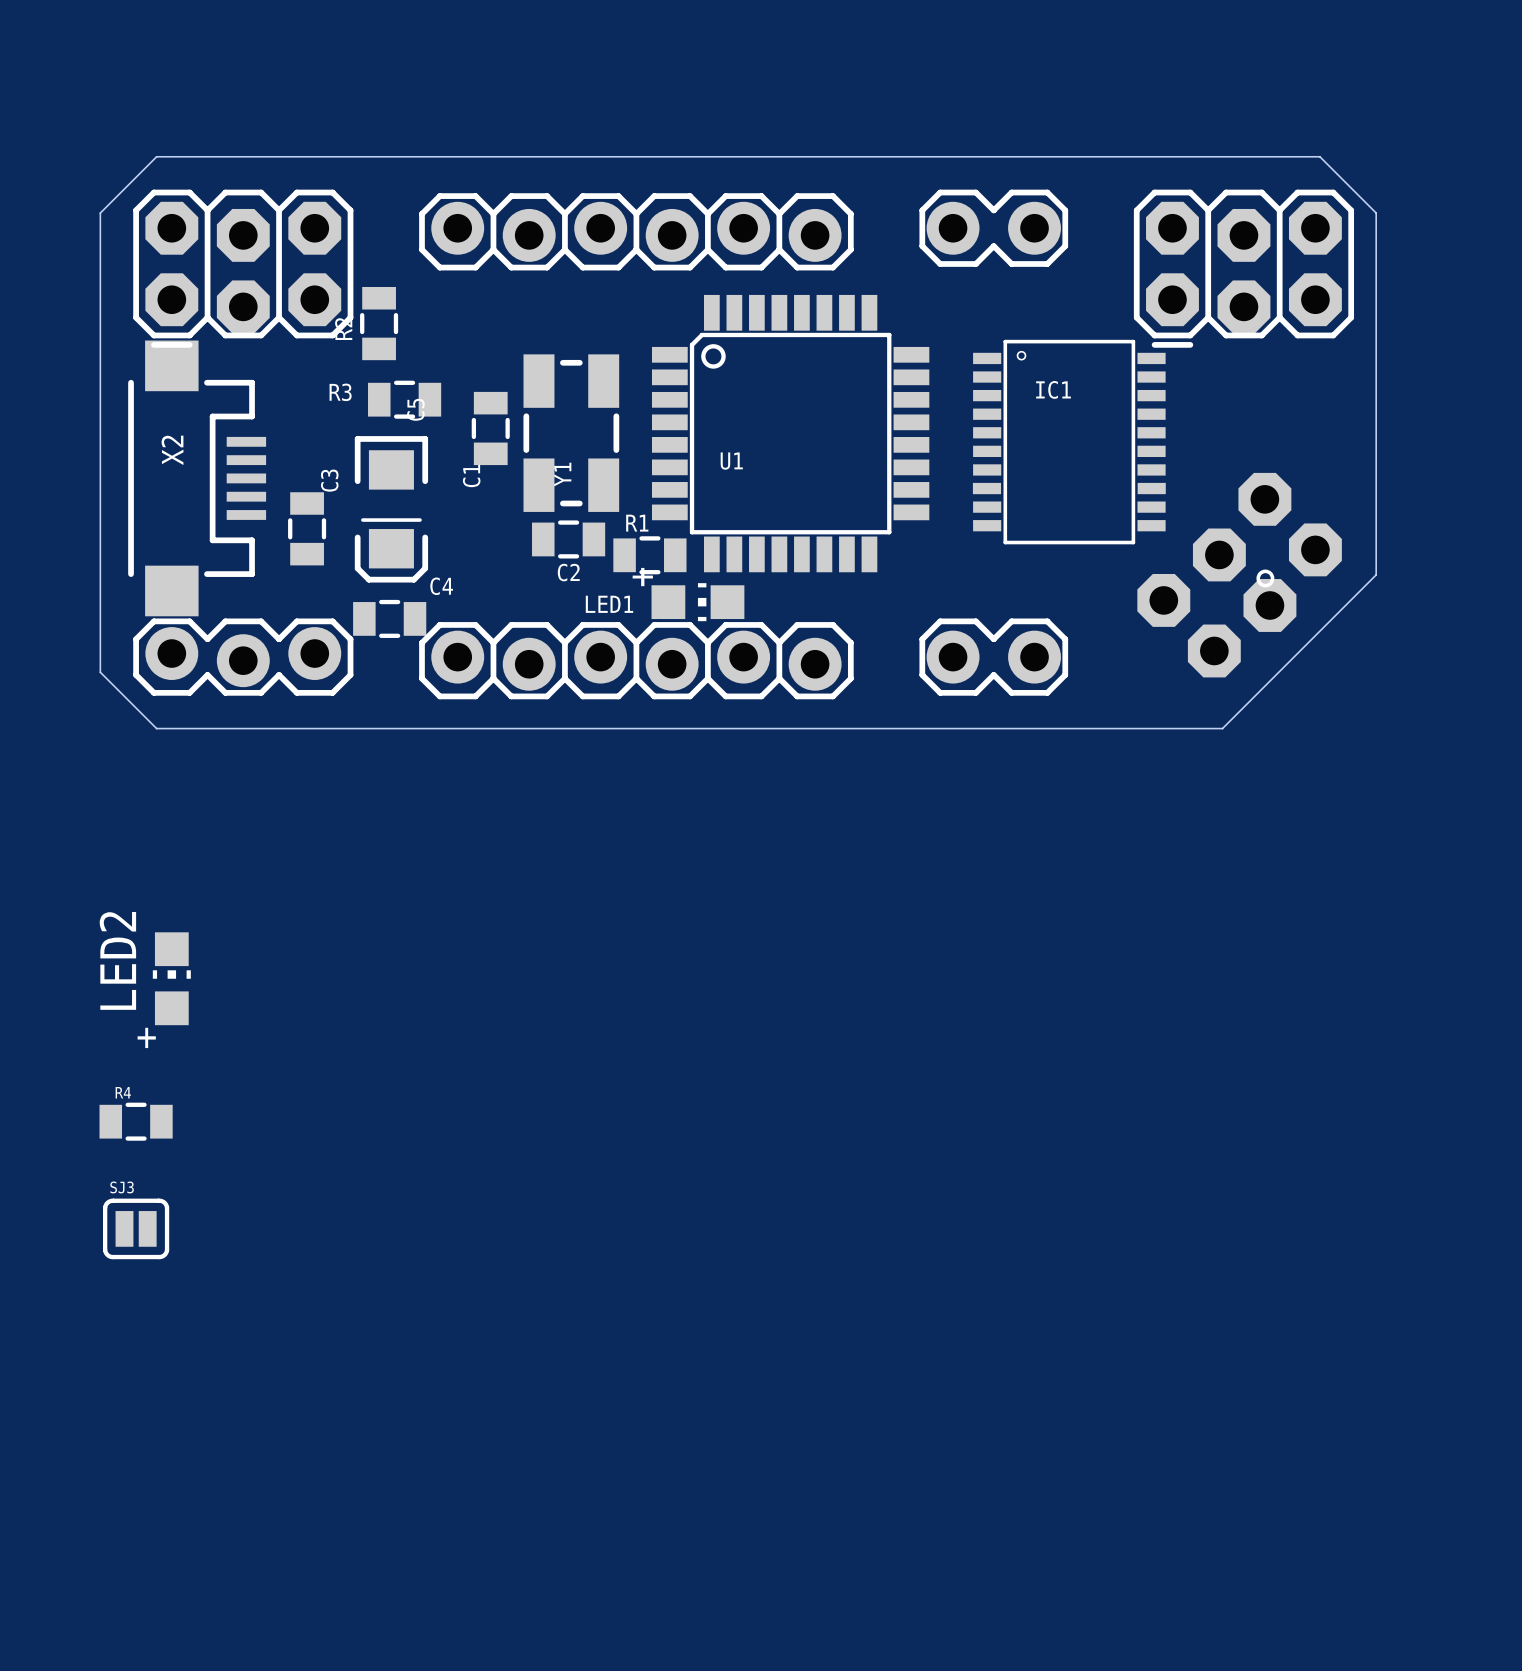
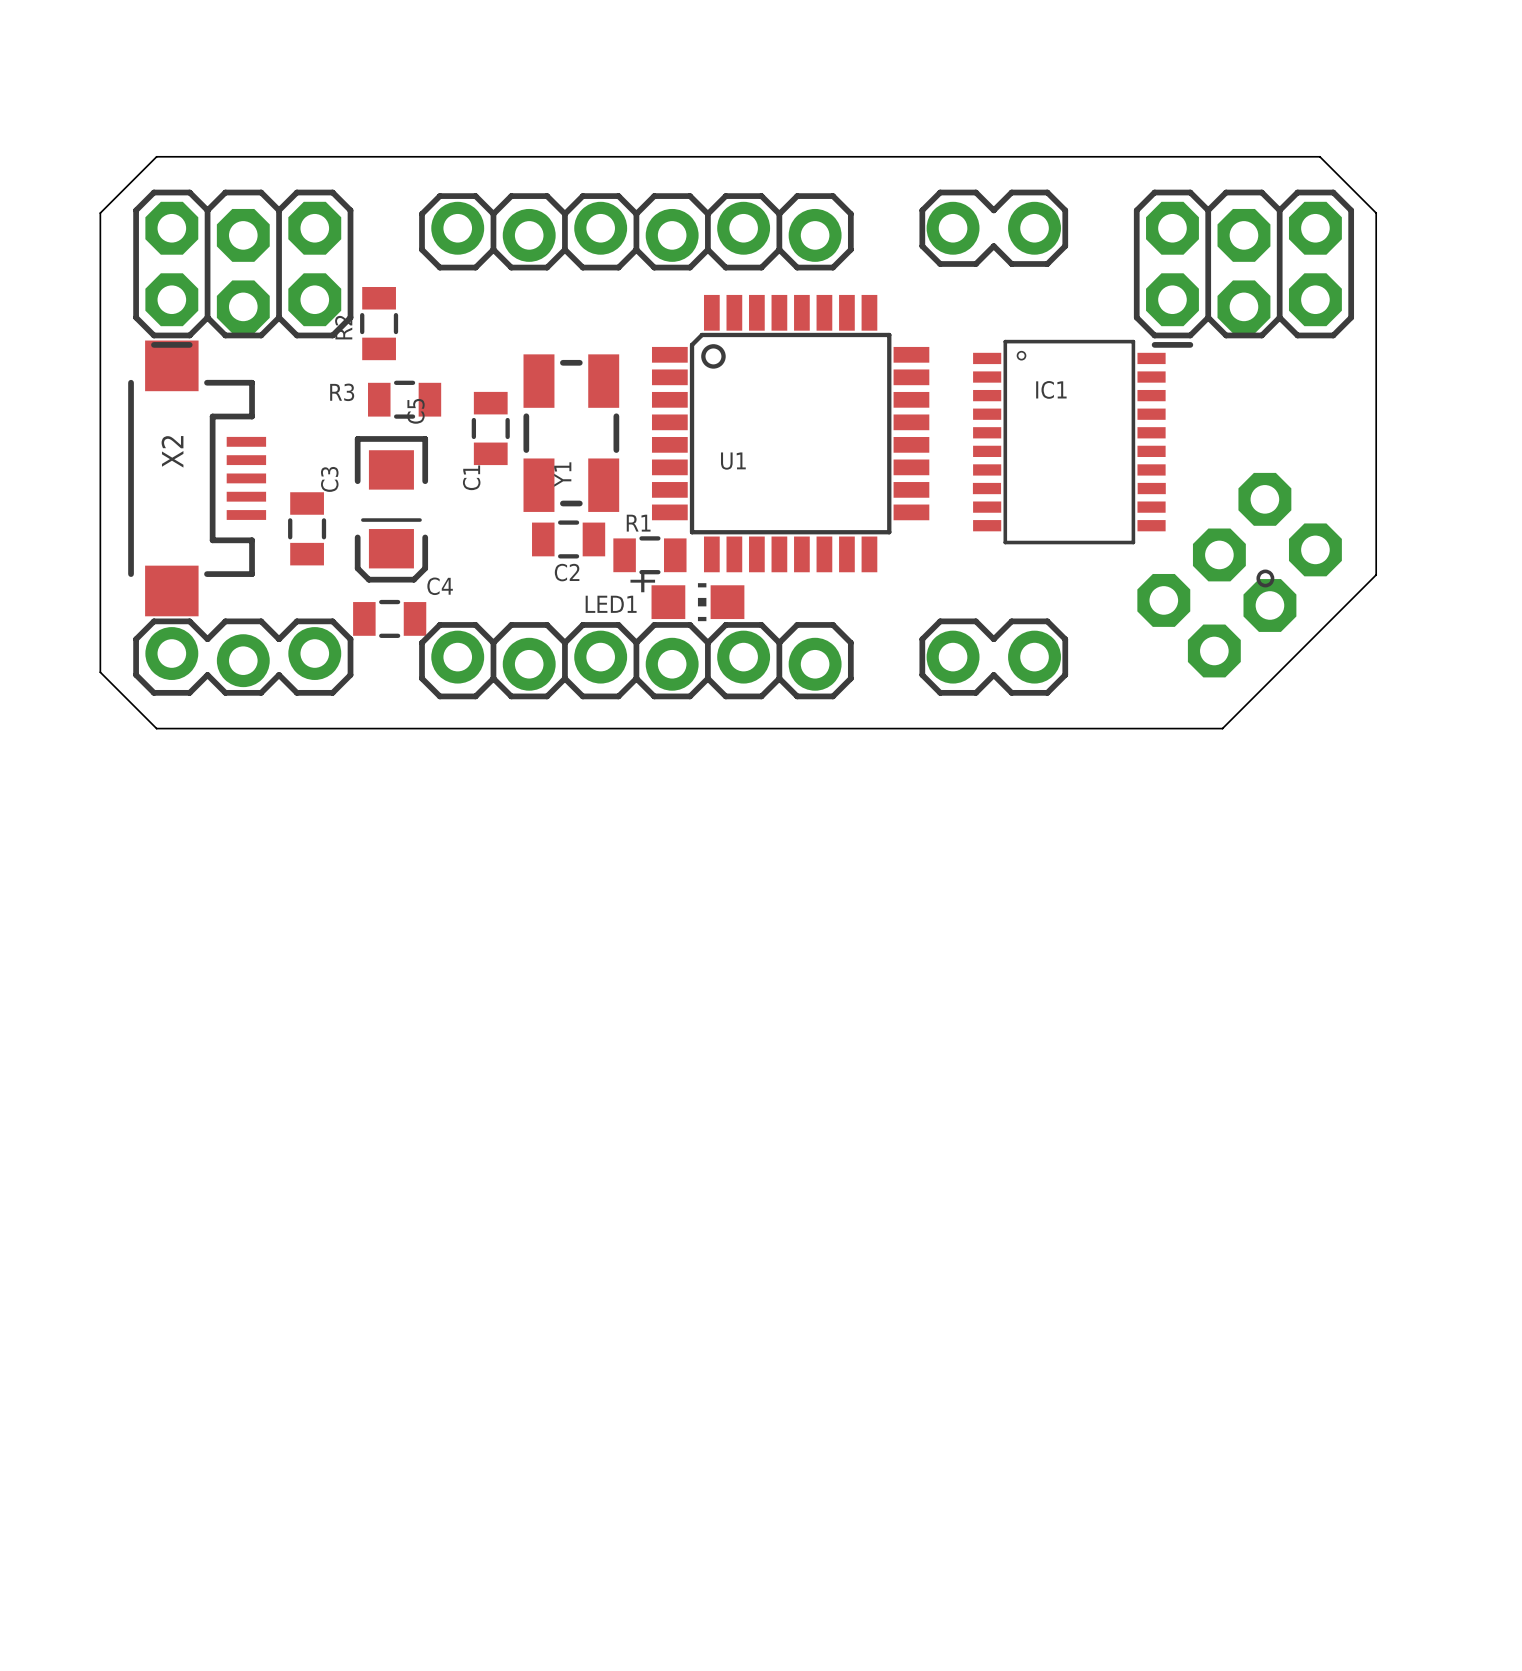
LED2: (171, 978) -> none
R4: (136, 1121) -> none
SJ3: (136, 1228) -> none

